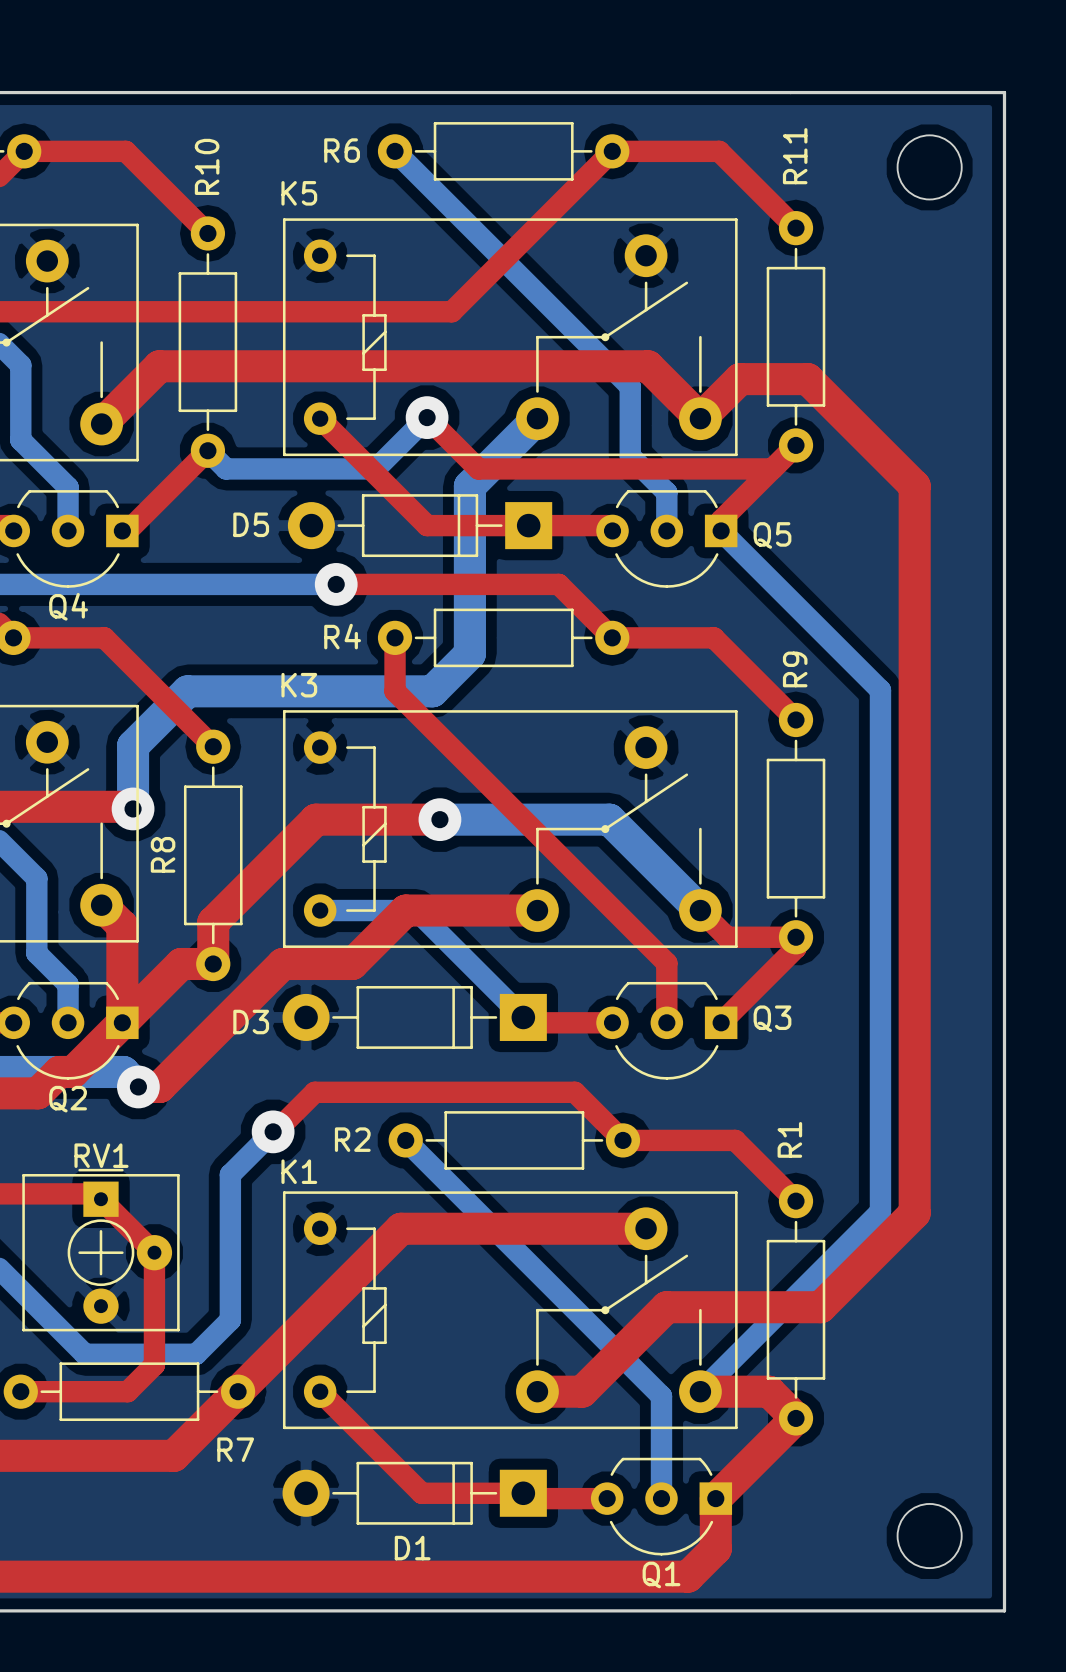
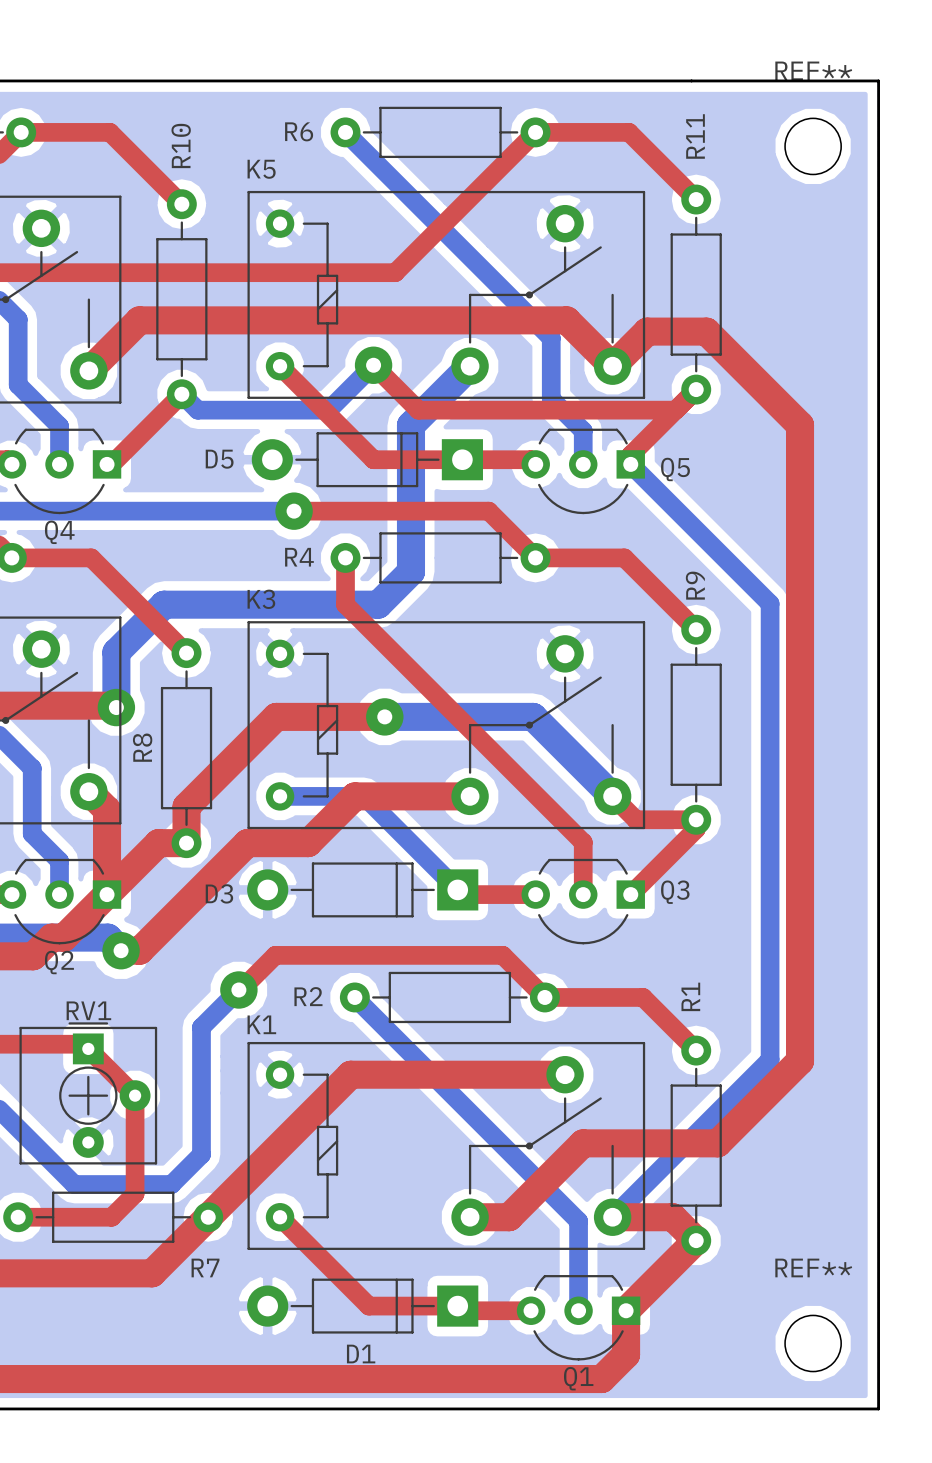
REF** name: none -> REF** (813, 70)
REF** name: none -> REF** (813, 1267)

